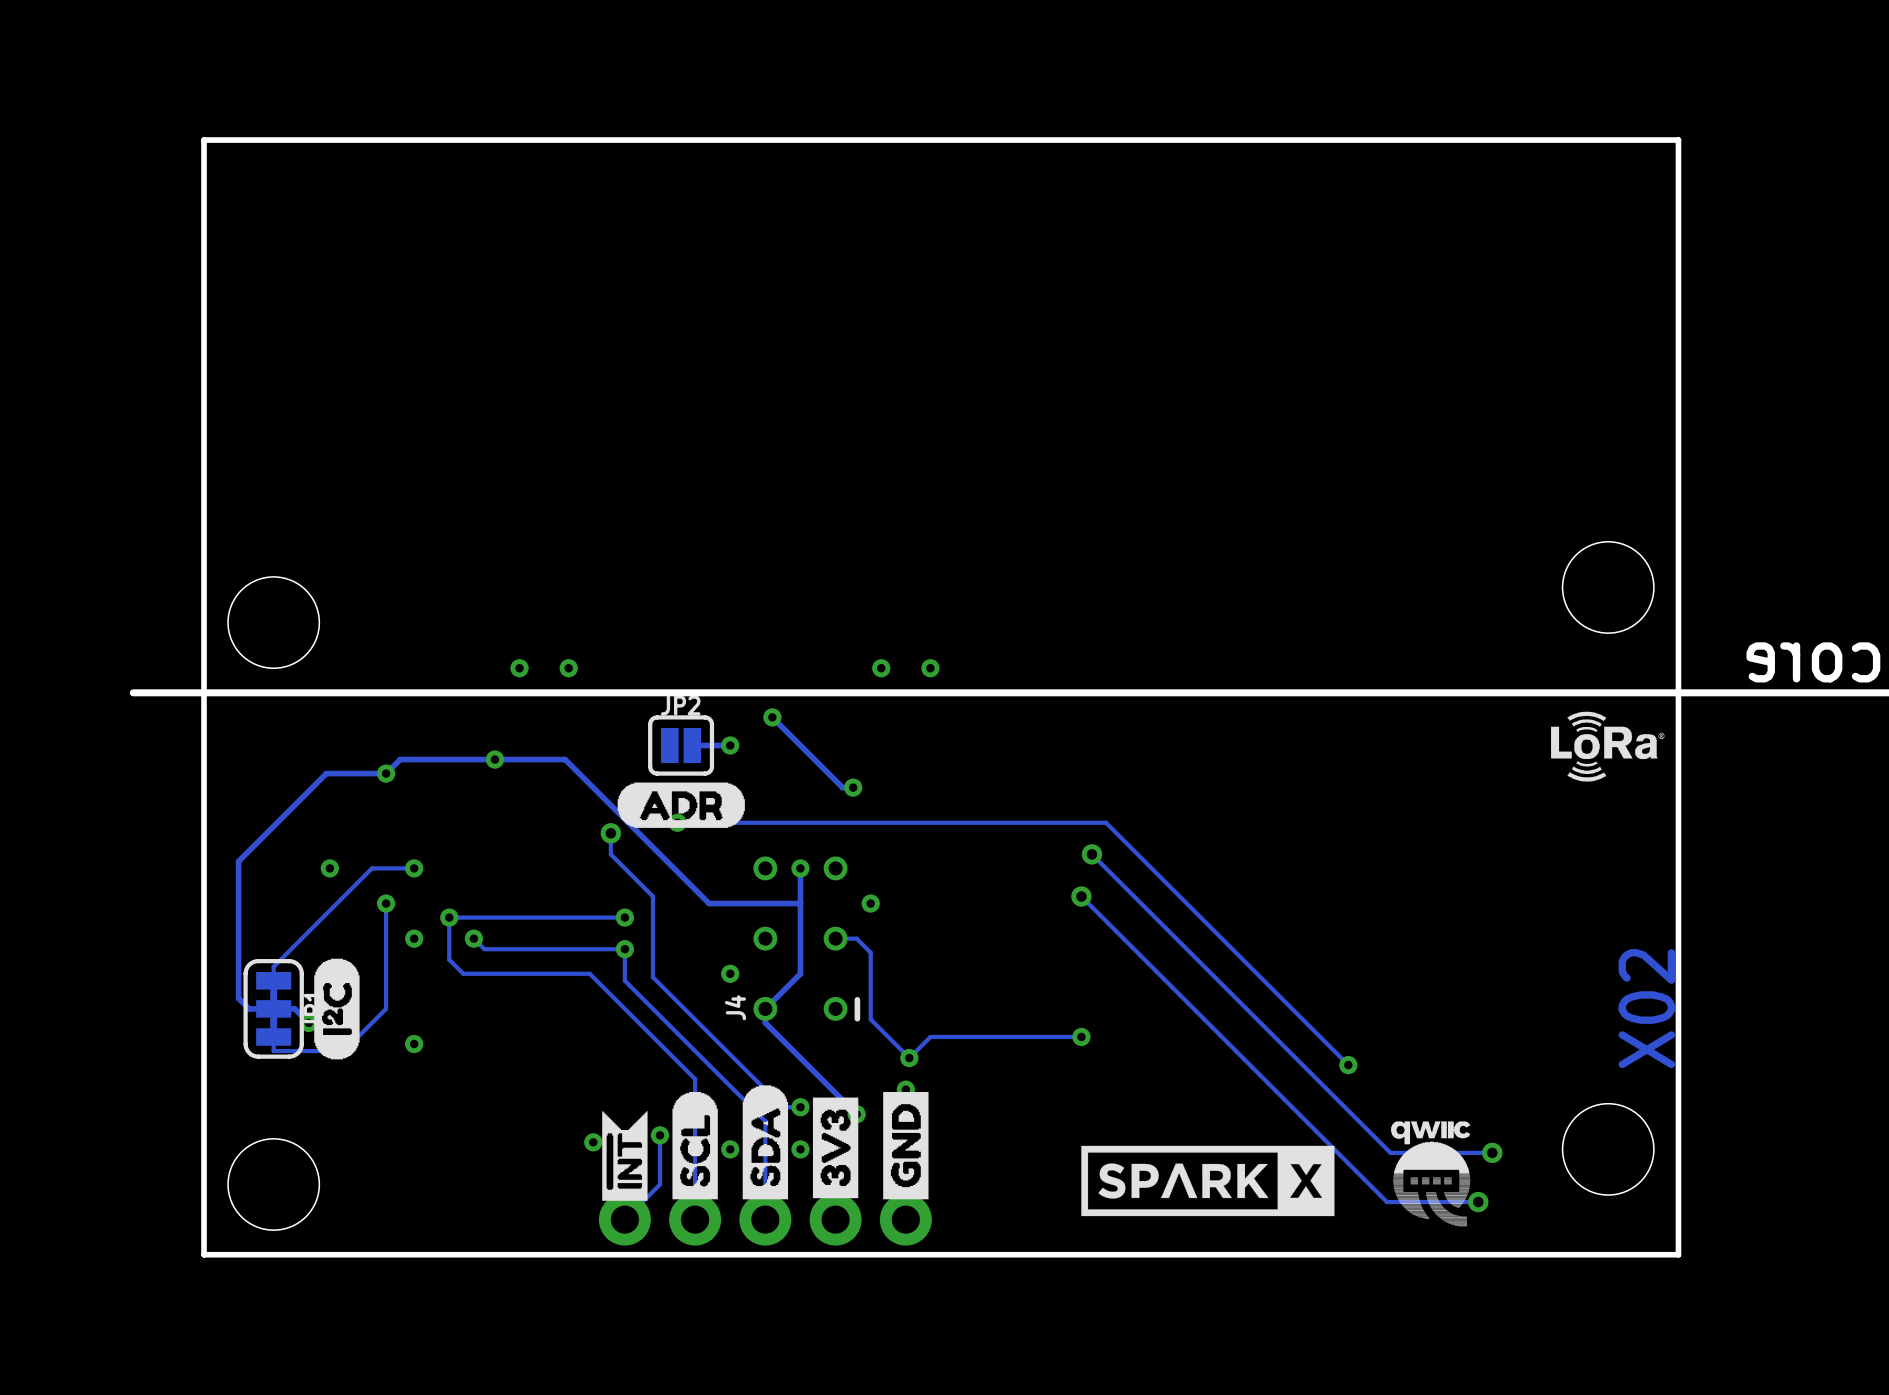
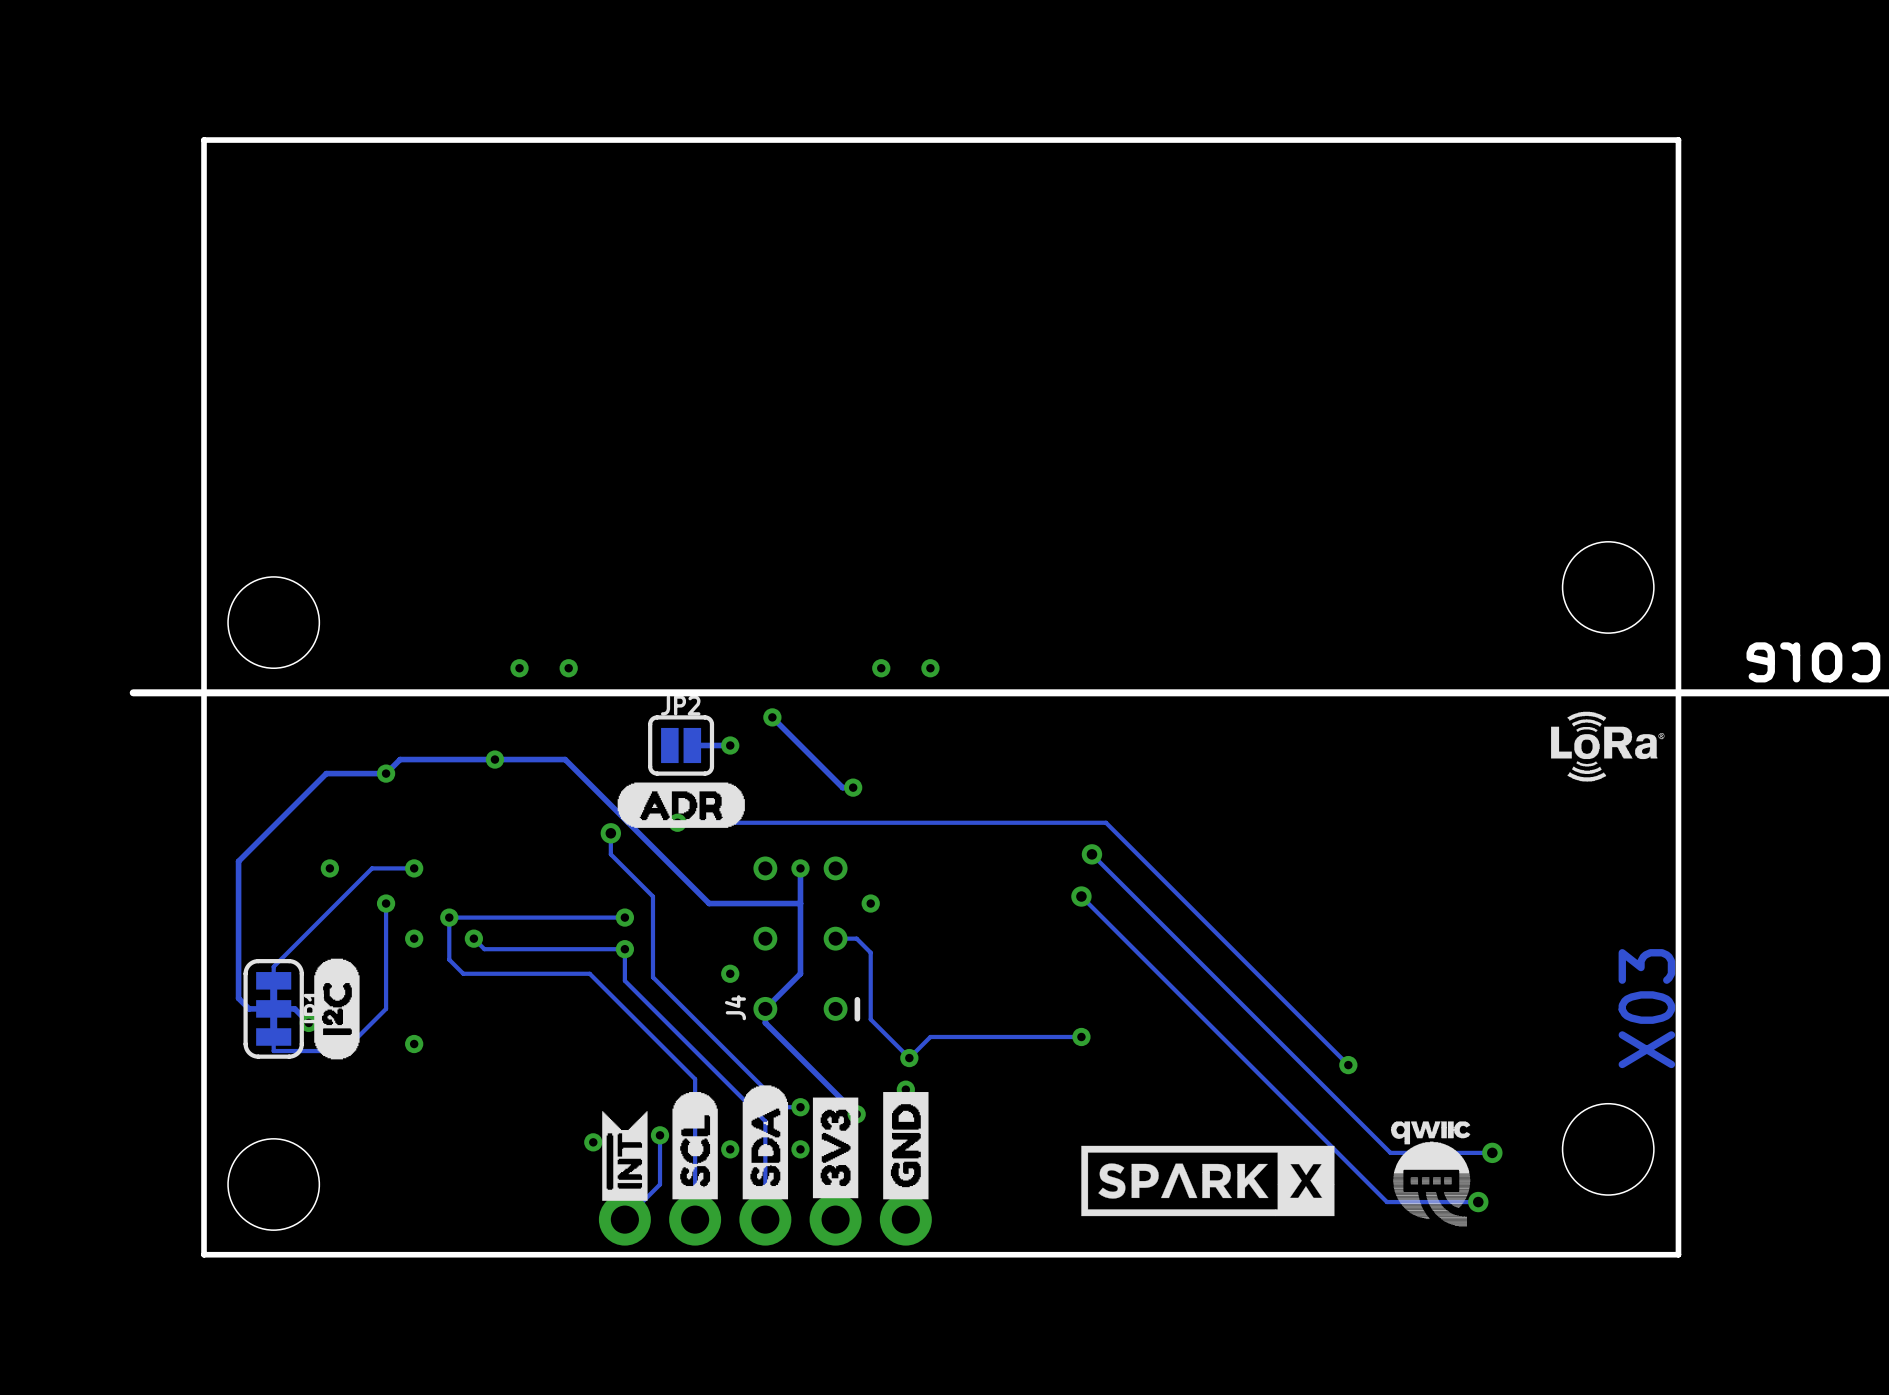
text: X02 (1646, 1008) -> X03 (1646, 1008)

